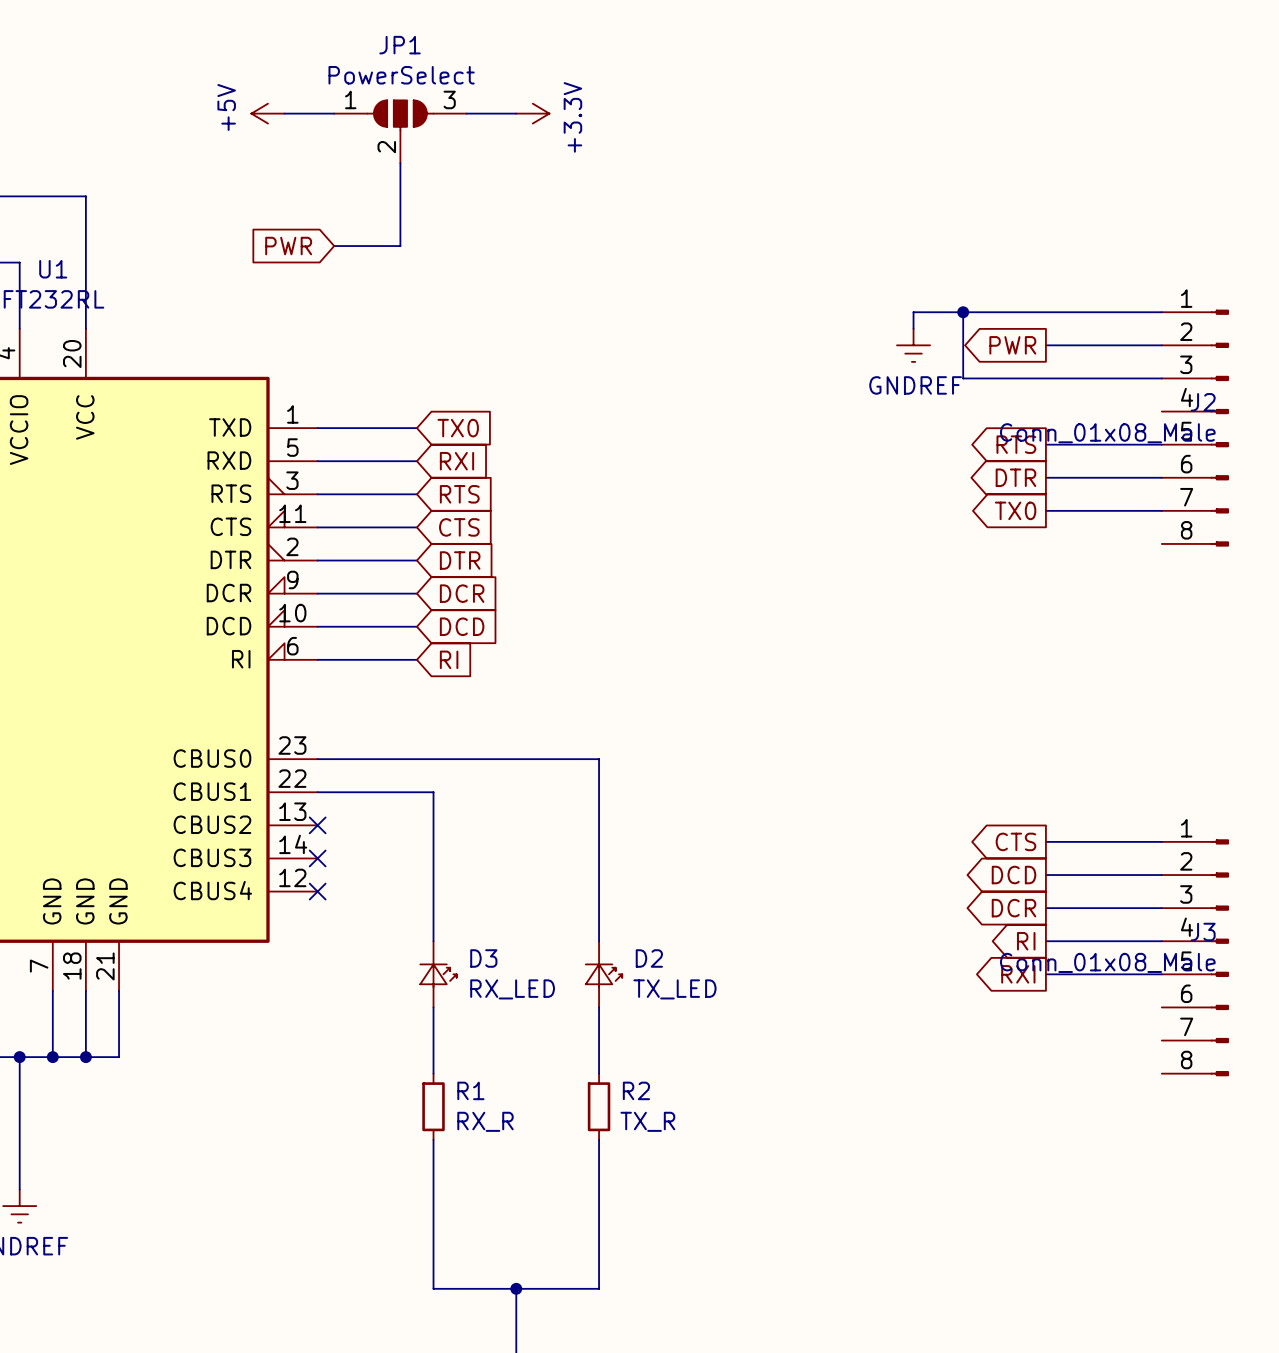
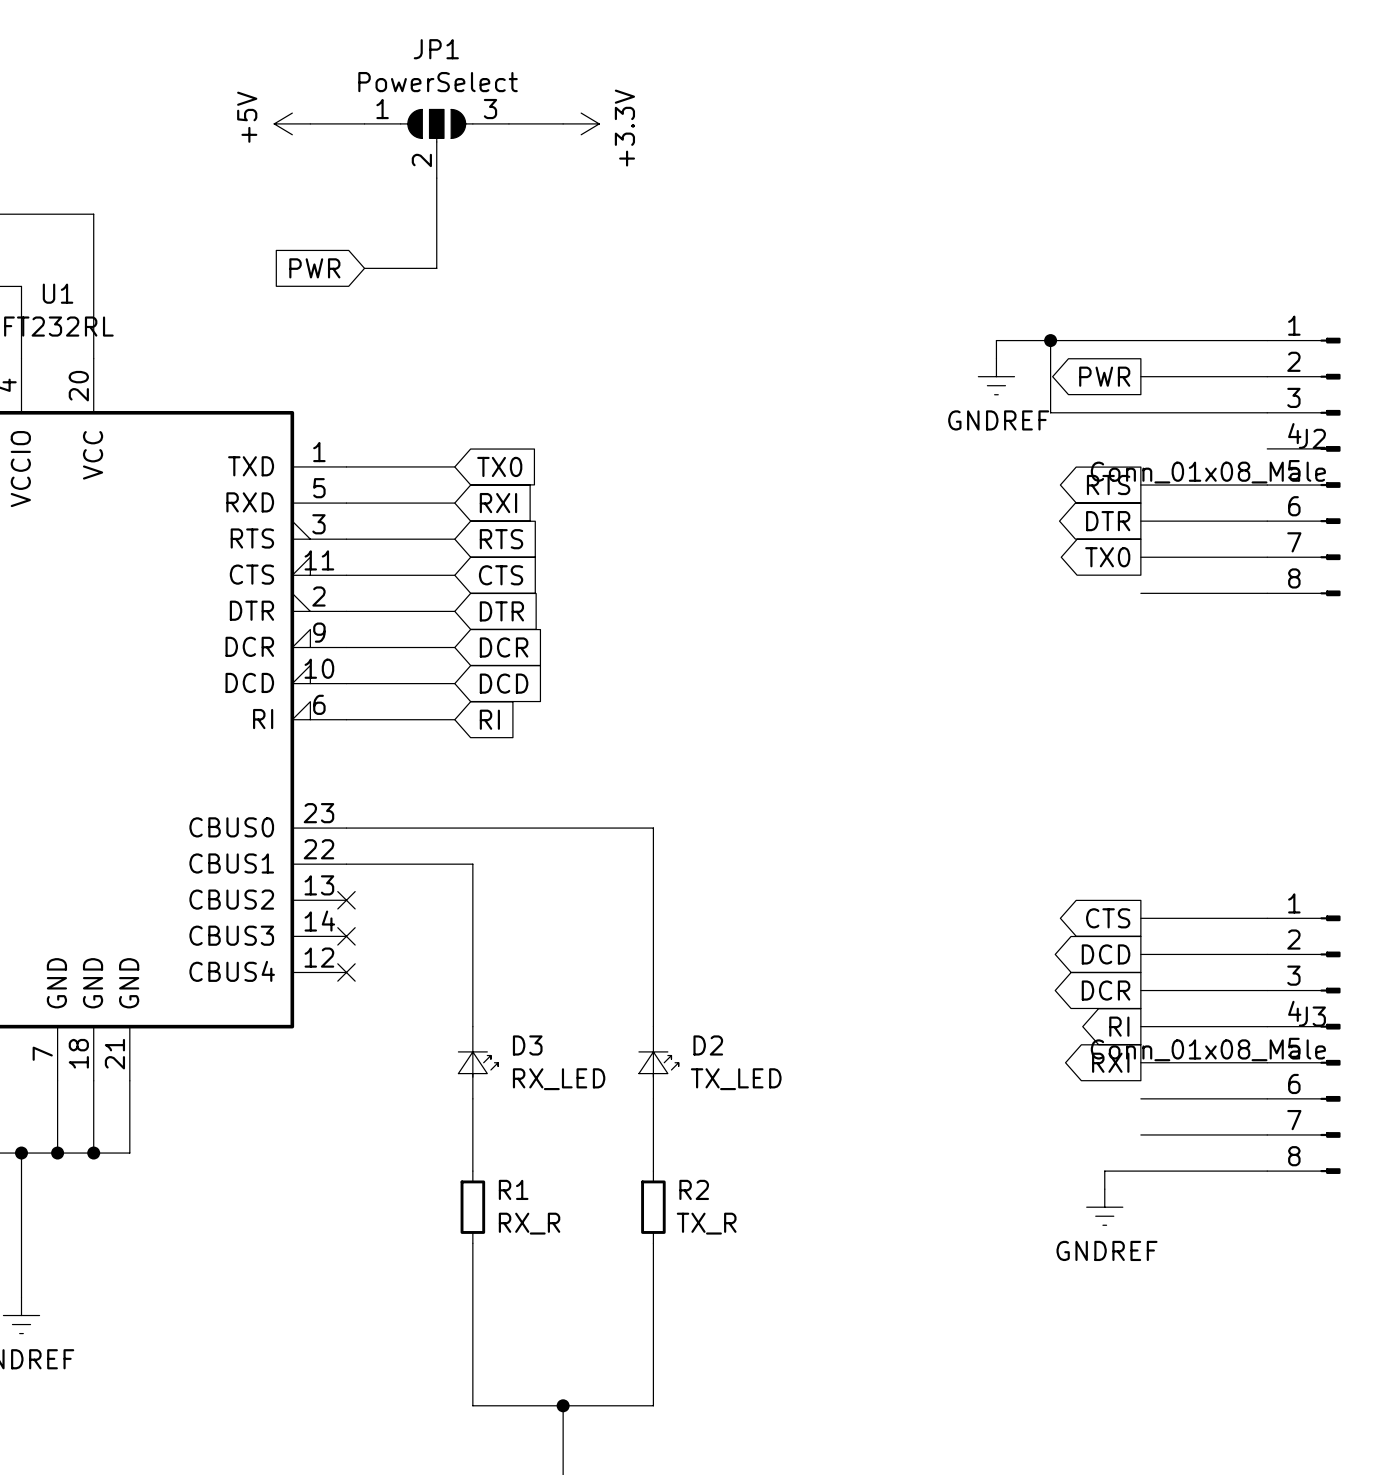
wire: none -> (1140, 593) (1267, 593)
wire: none -> (1140, 1098) (1267, 1098)
wire: none -> (1140, 1134) (1267, 1134)
wire: none -> (1267, 1171) (1104, 1171) (1104, 1189)
power symbol: none -> GNDREF (1104, 1207)

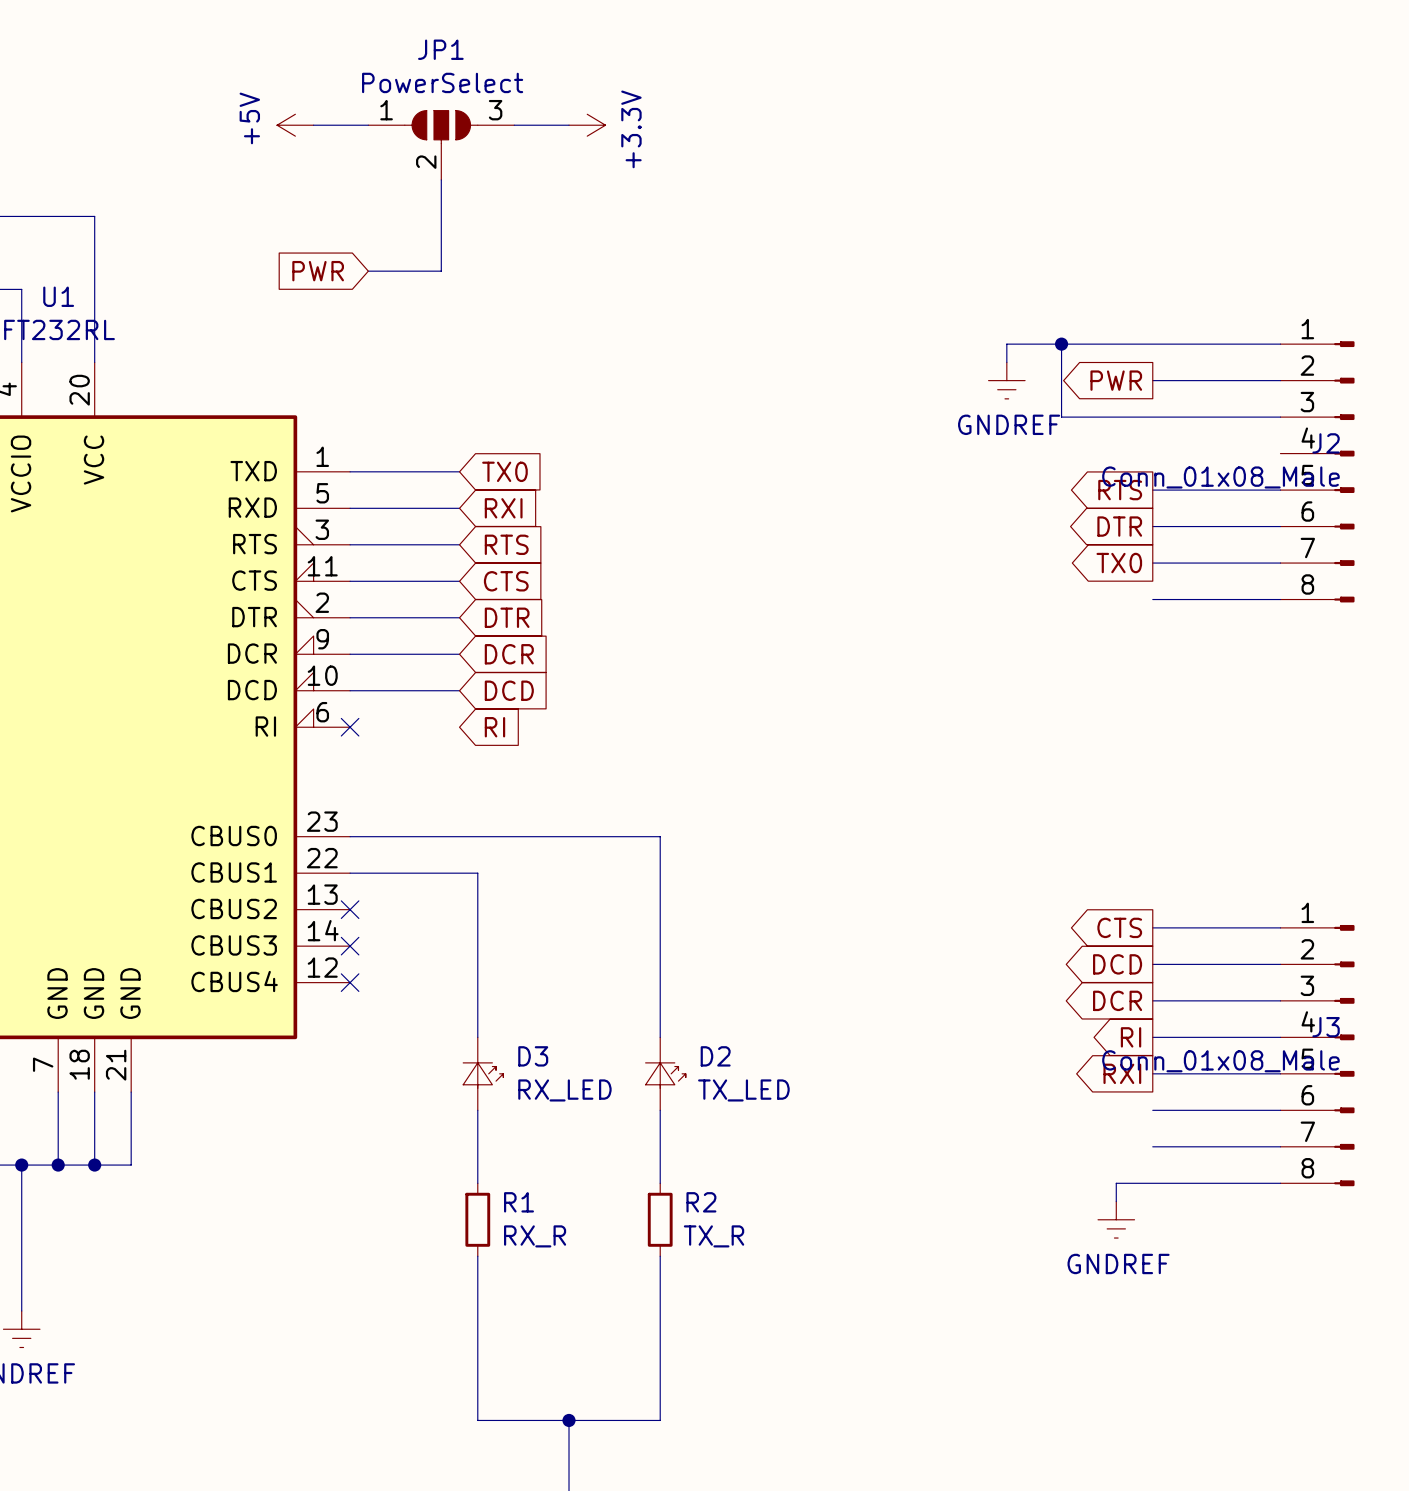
wire: (346, 719) (454, 719) -> none
no-connect mark: none -> (350, 727)

